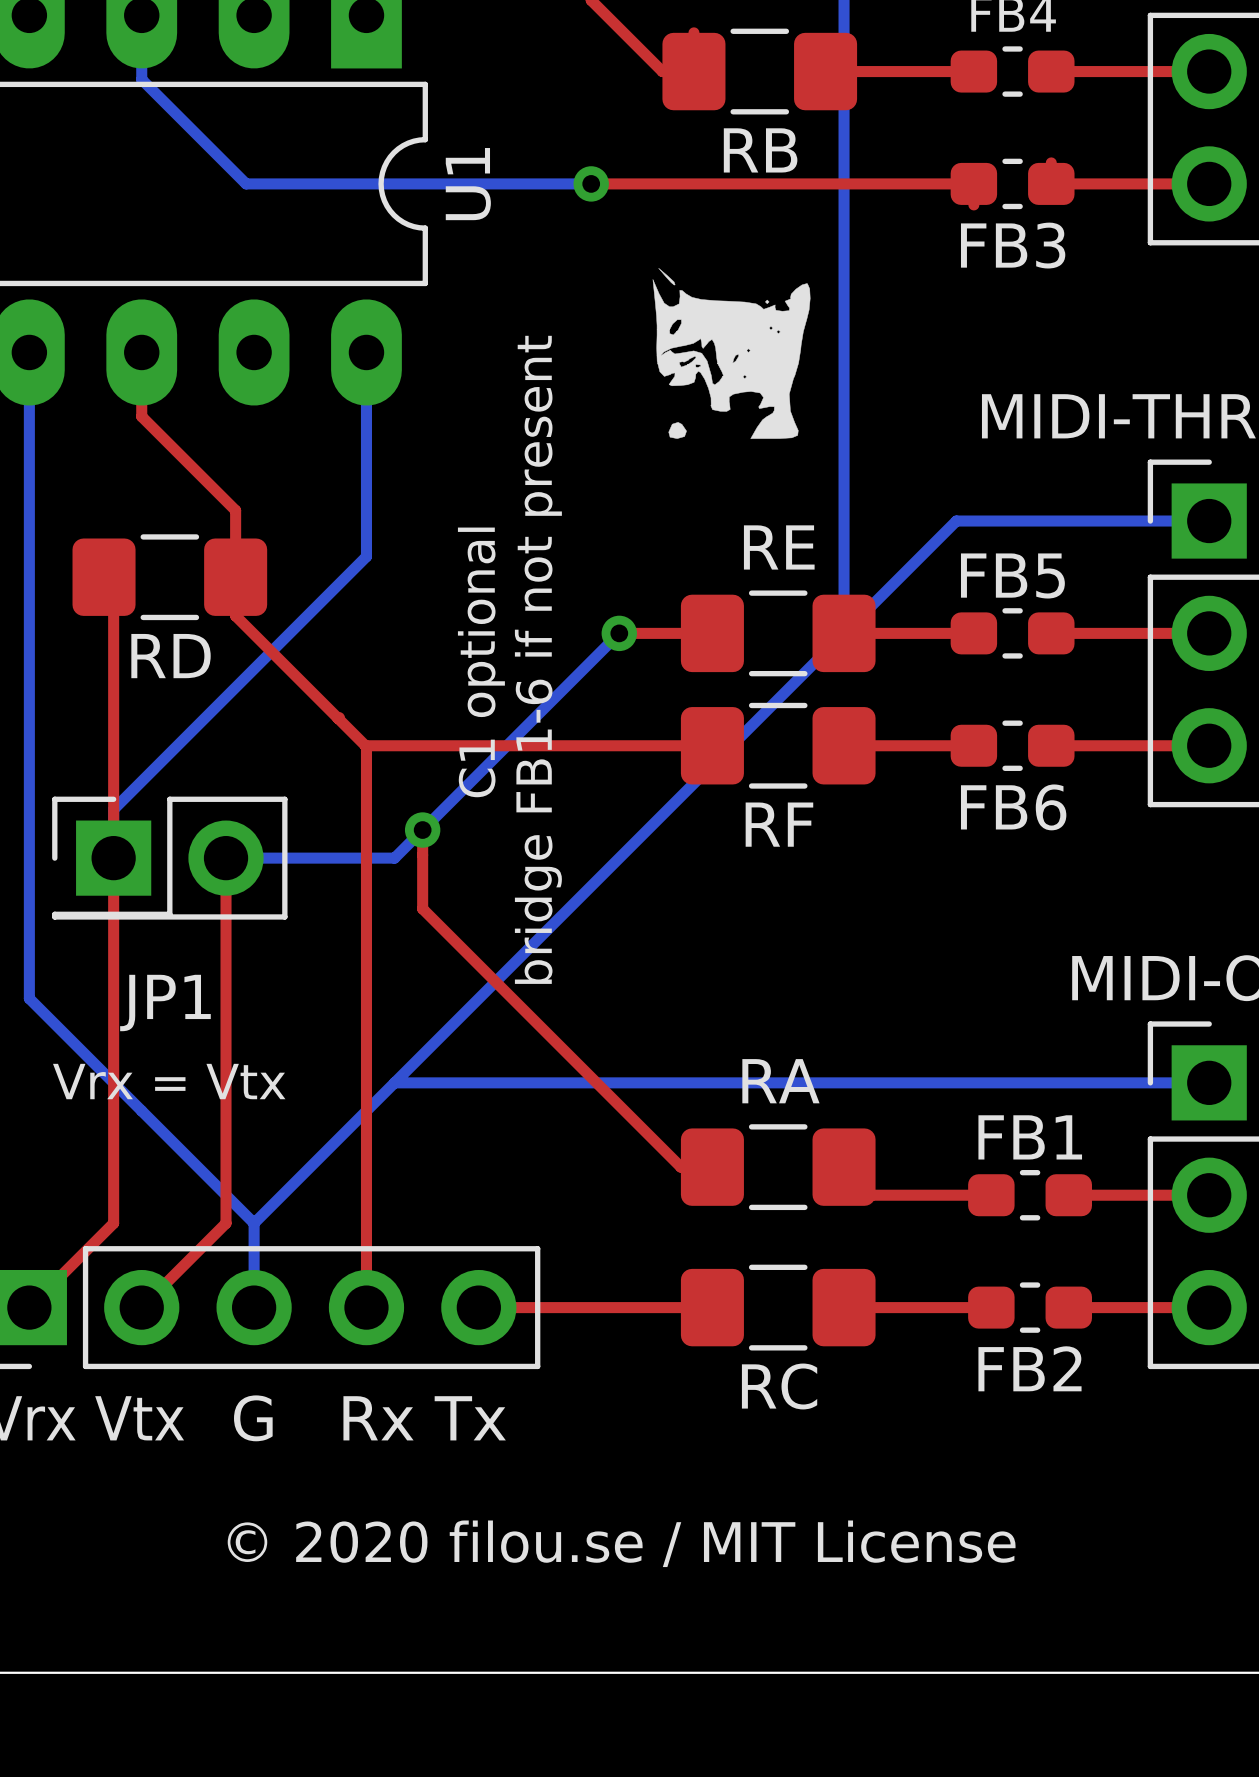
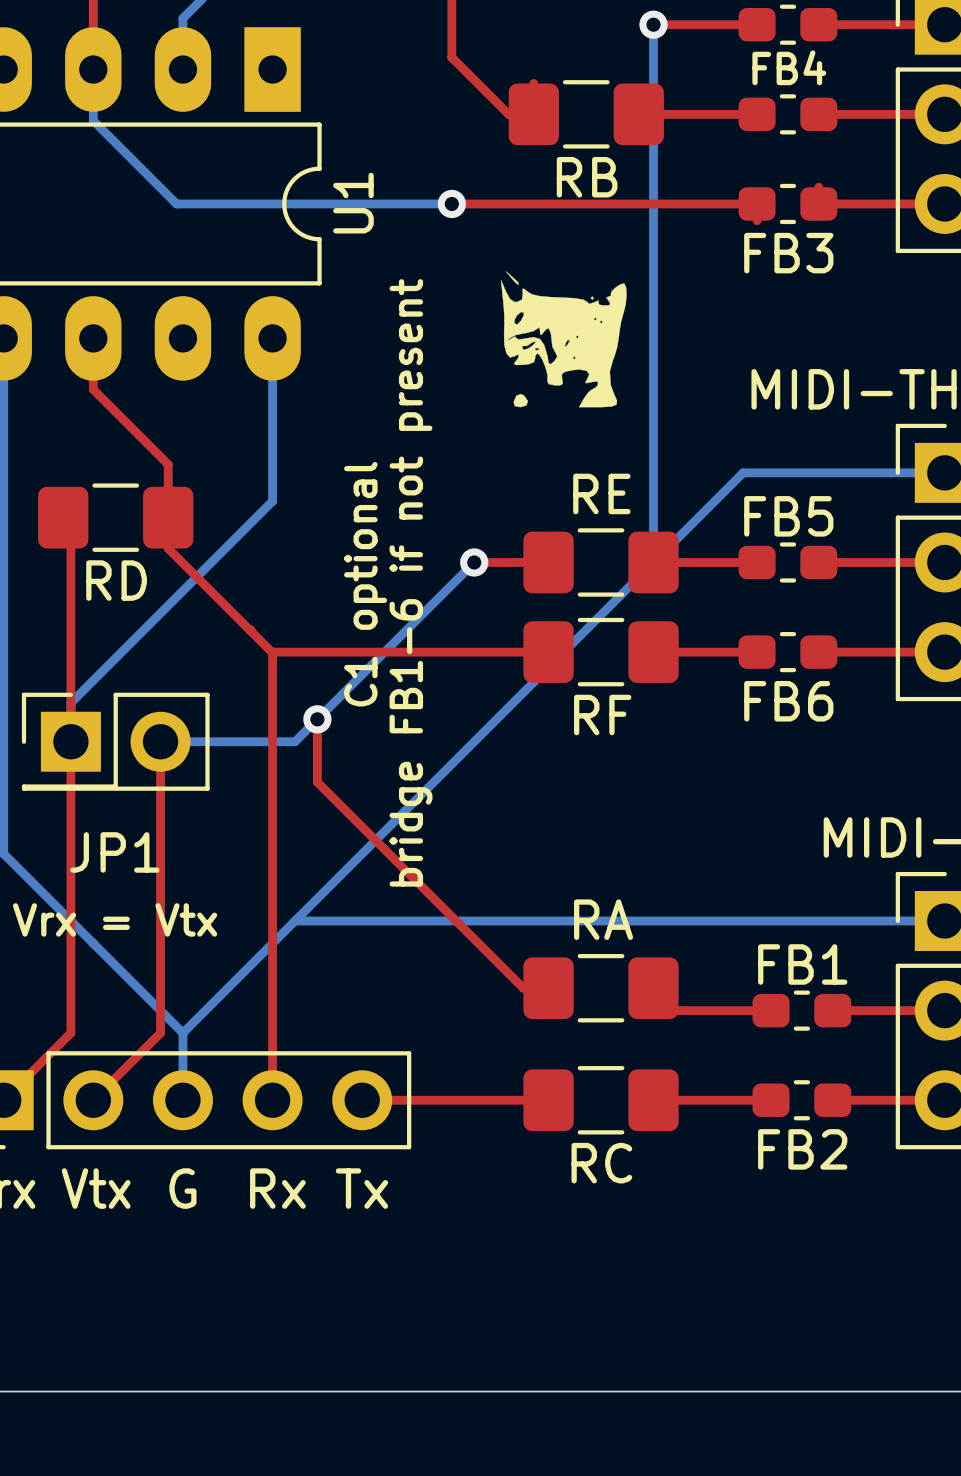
text: © 2020 filou.se / MIT License (621, 1543) -> none

